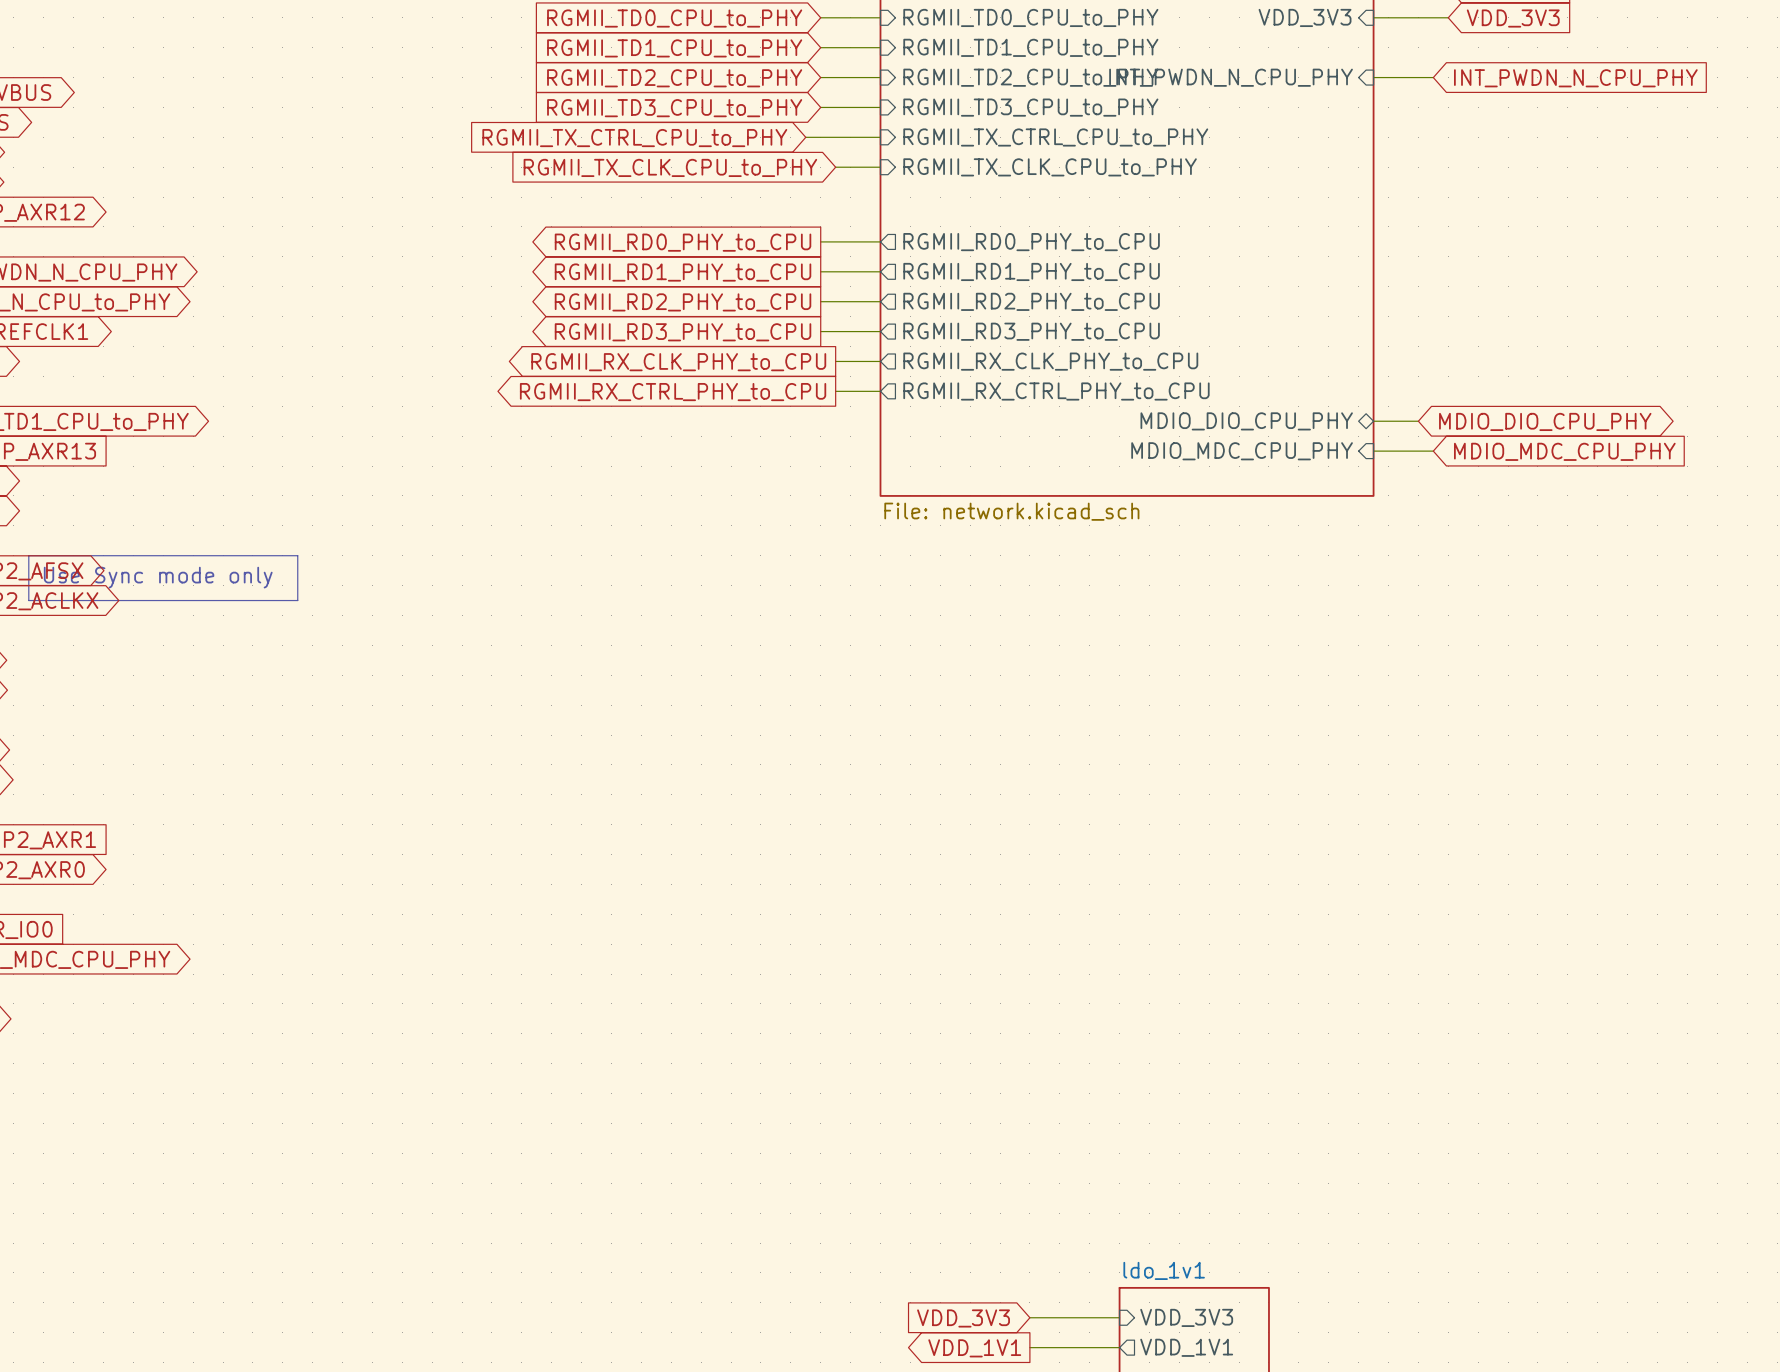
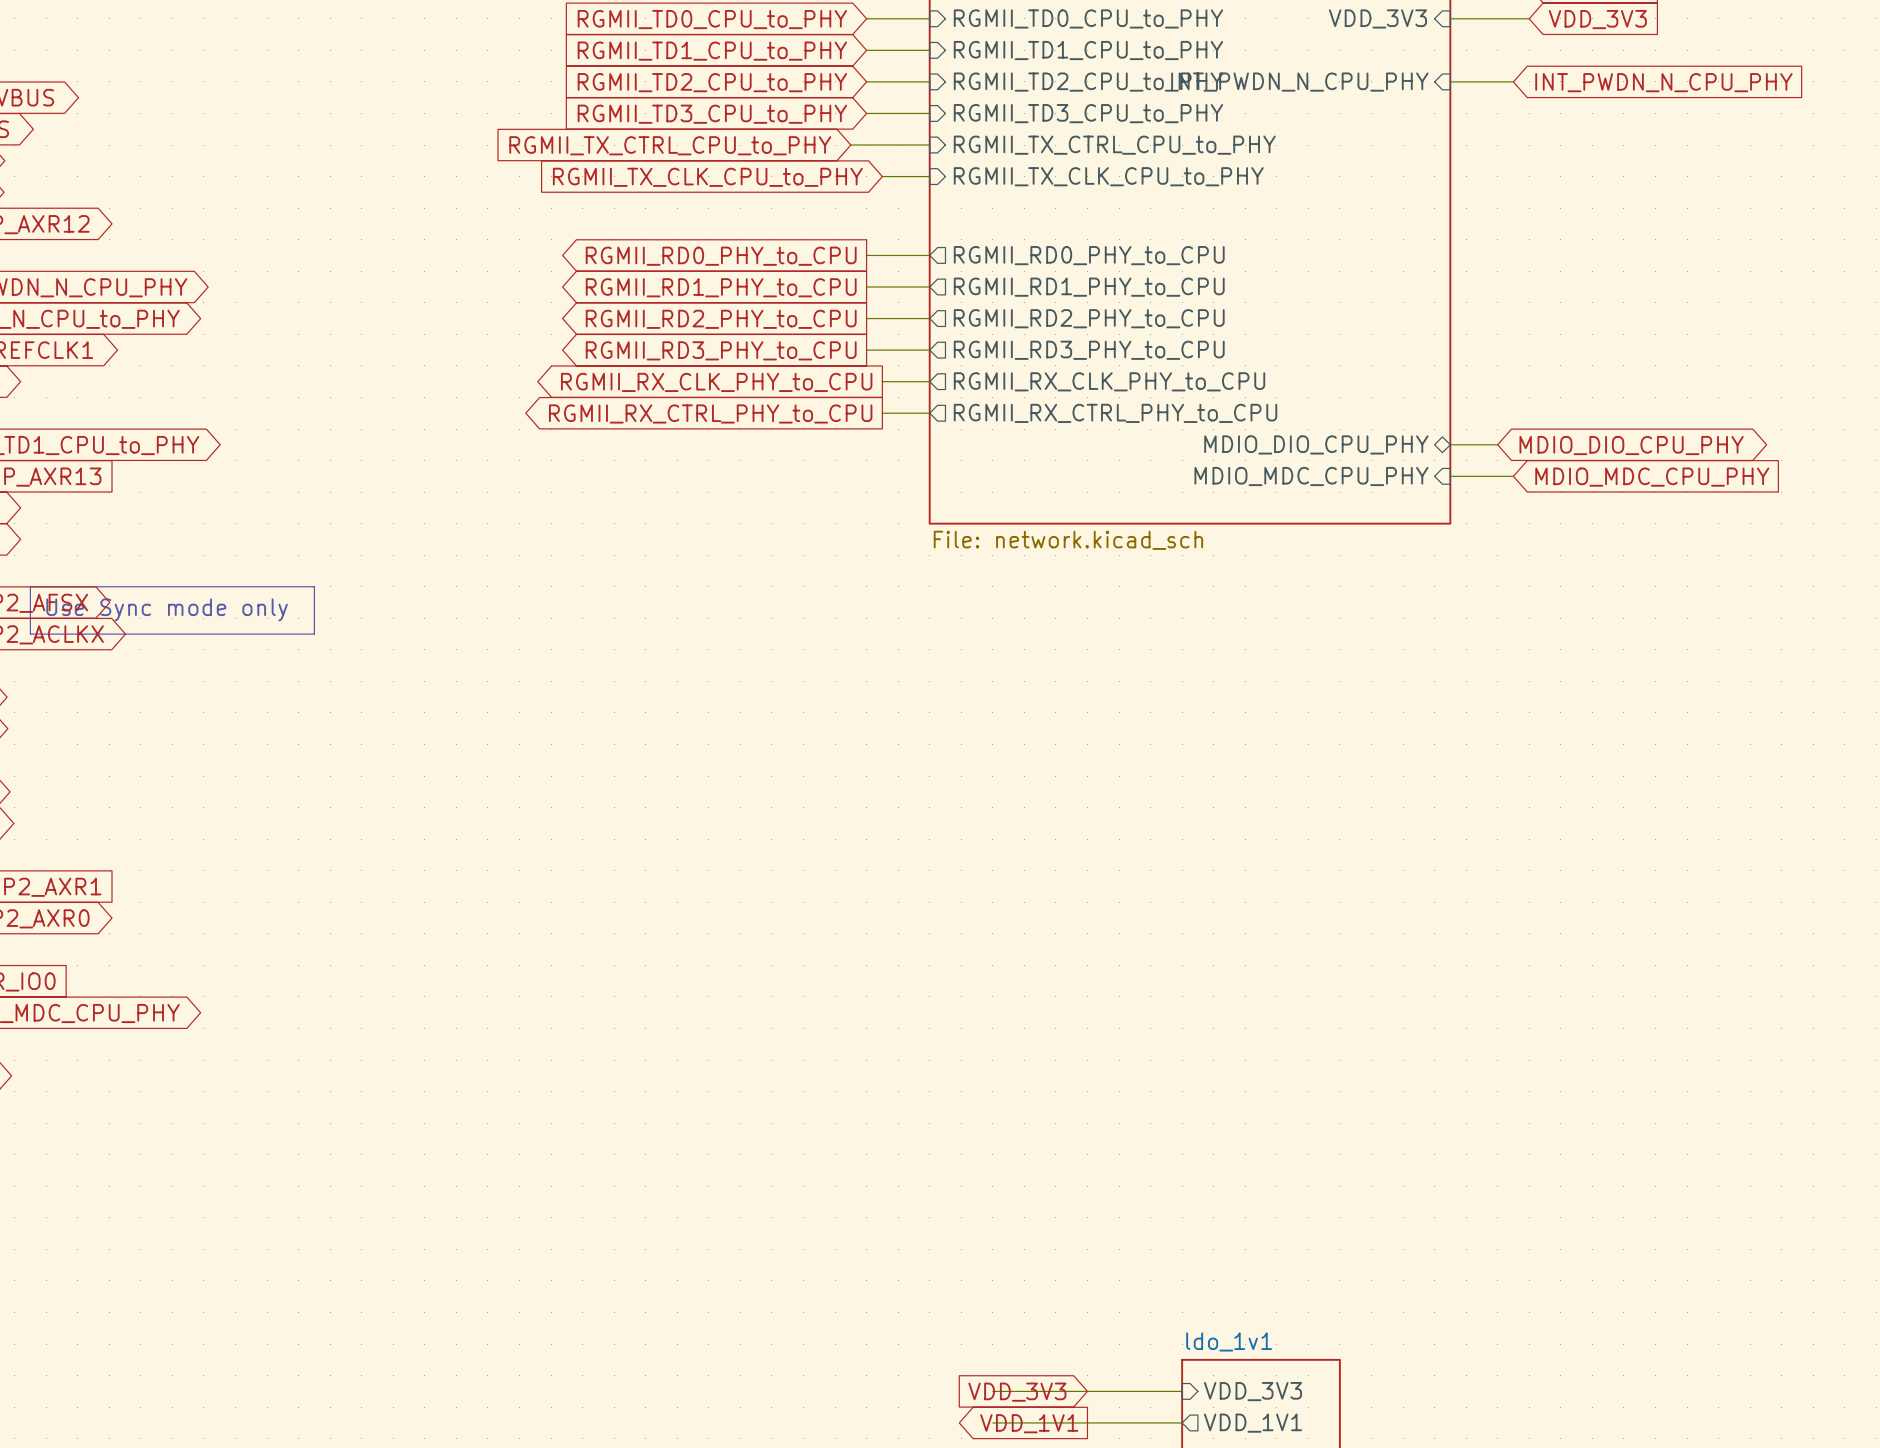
wire: none -> (992, 1391) (1087, 1391)
wire: none -> (992, 1422) (1087, 1422)

